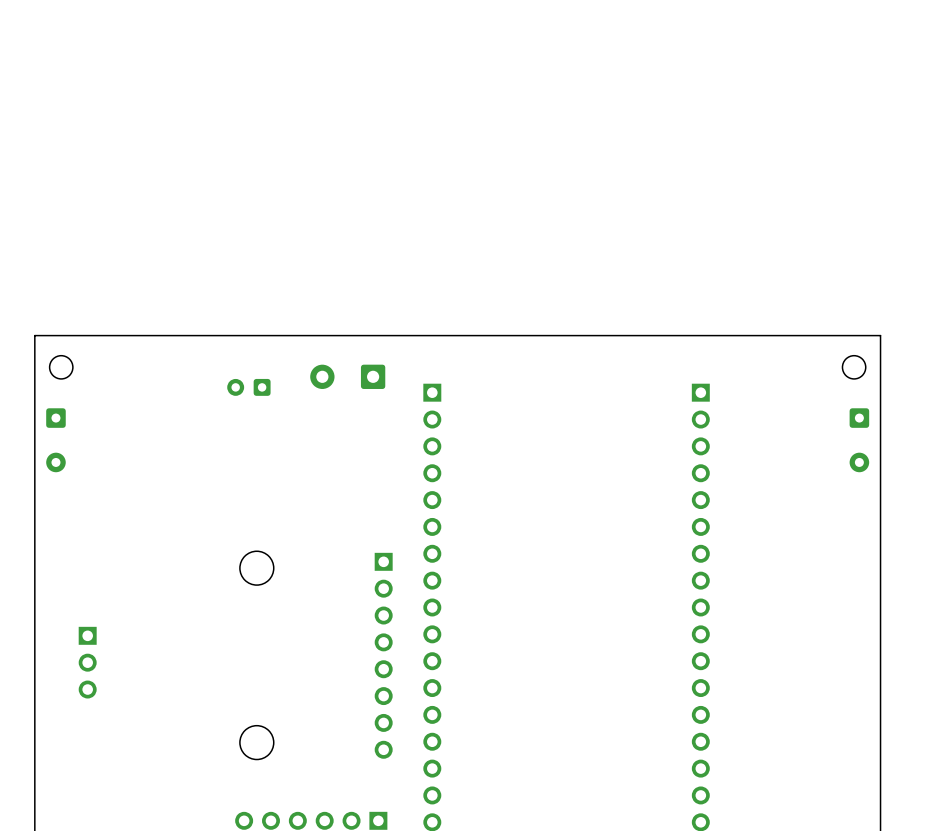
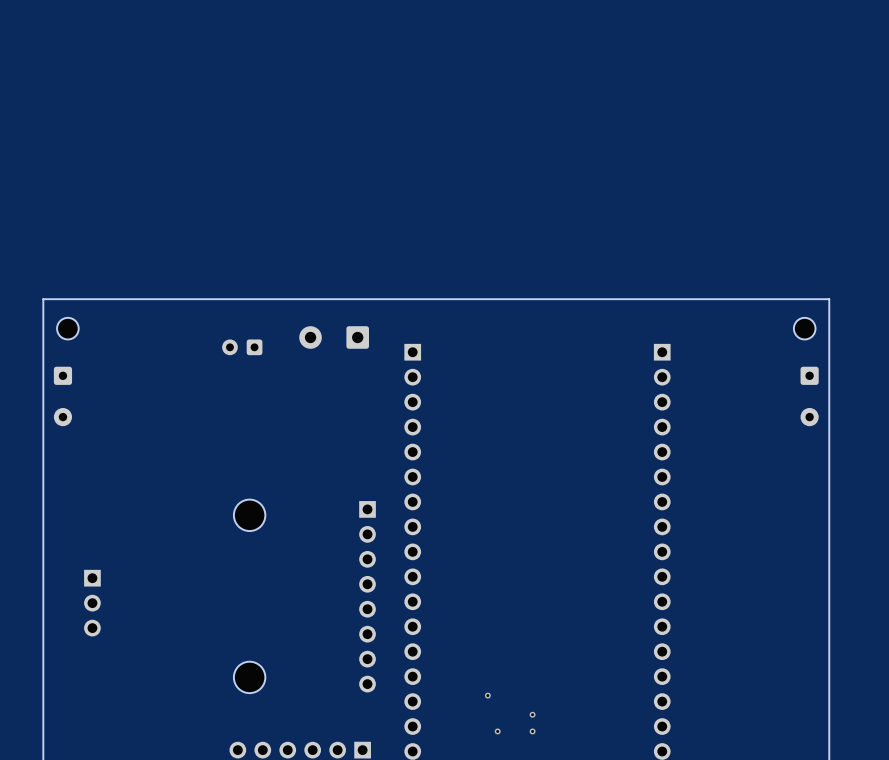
via: none -> (487, 695)
via: none -> (532, 714)
via: none -> (497, 731)
via: none -> (532, 731)

